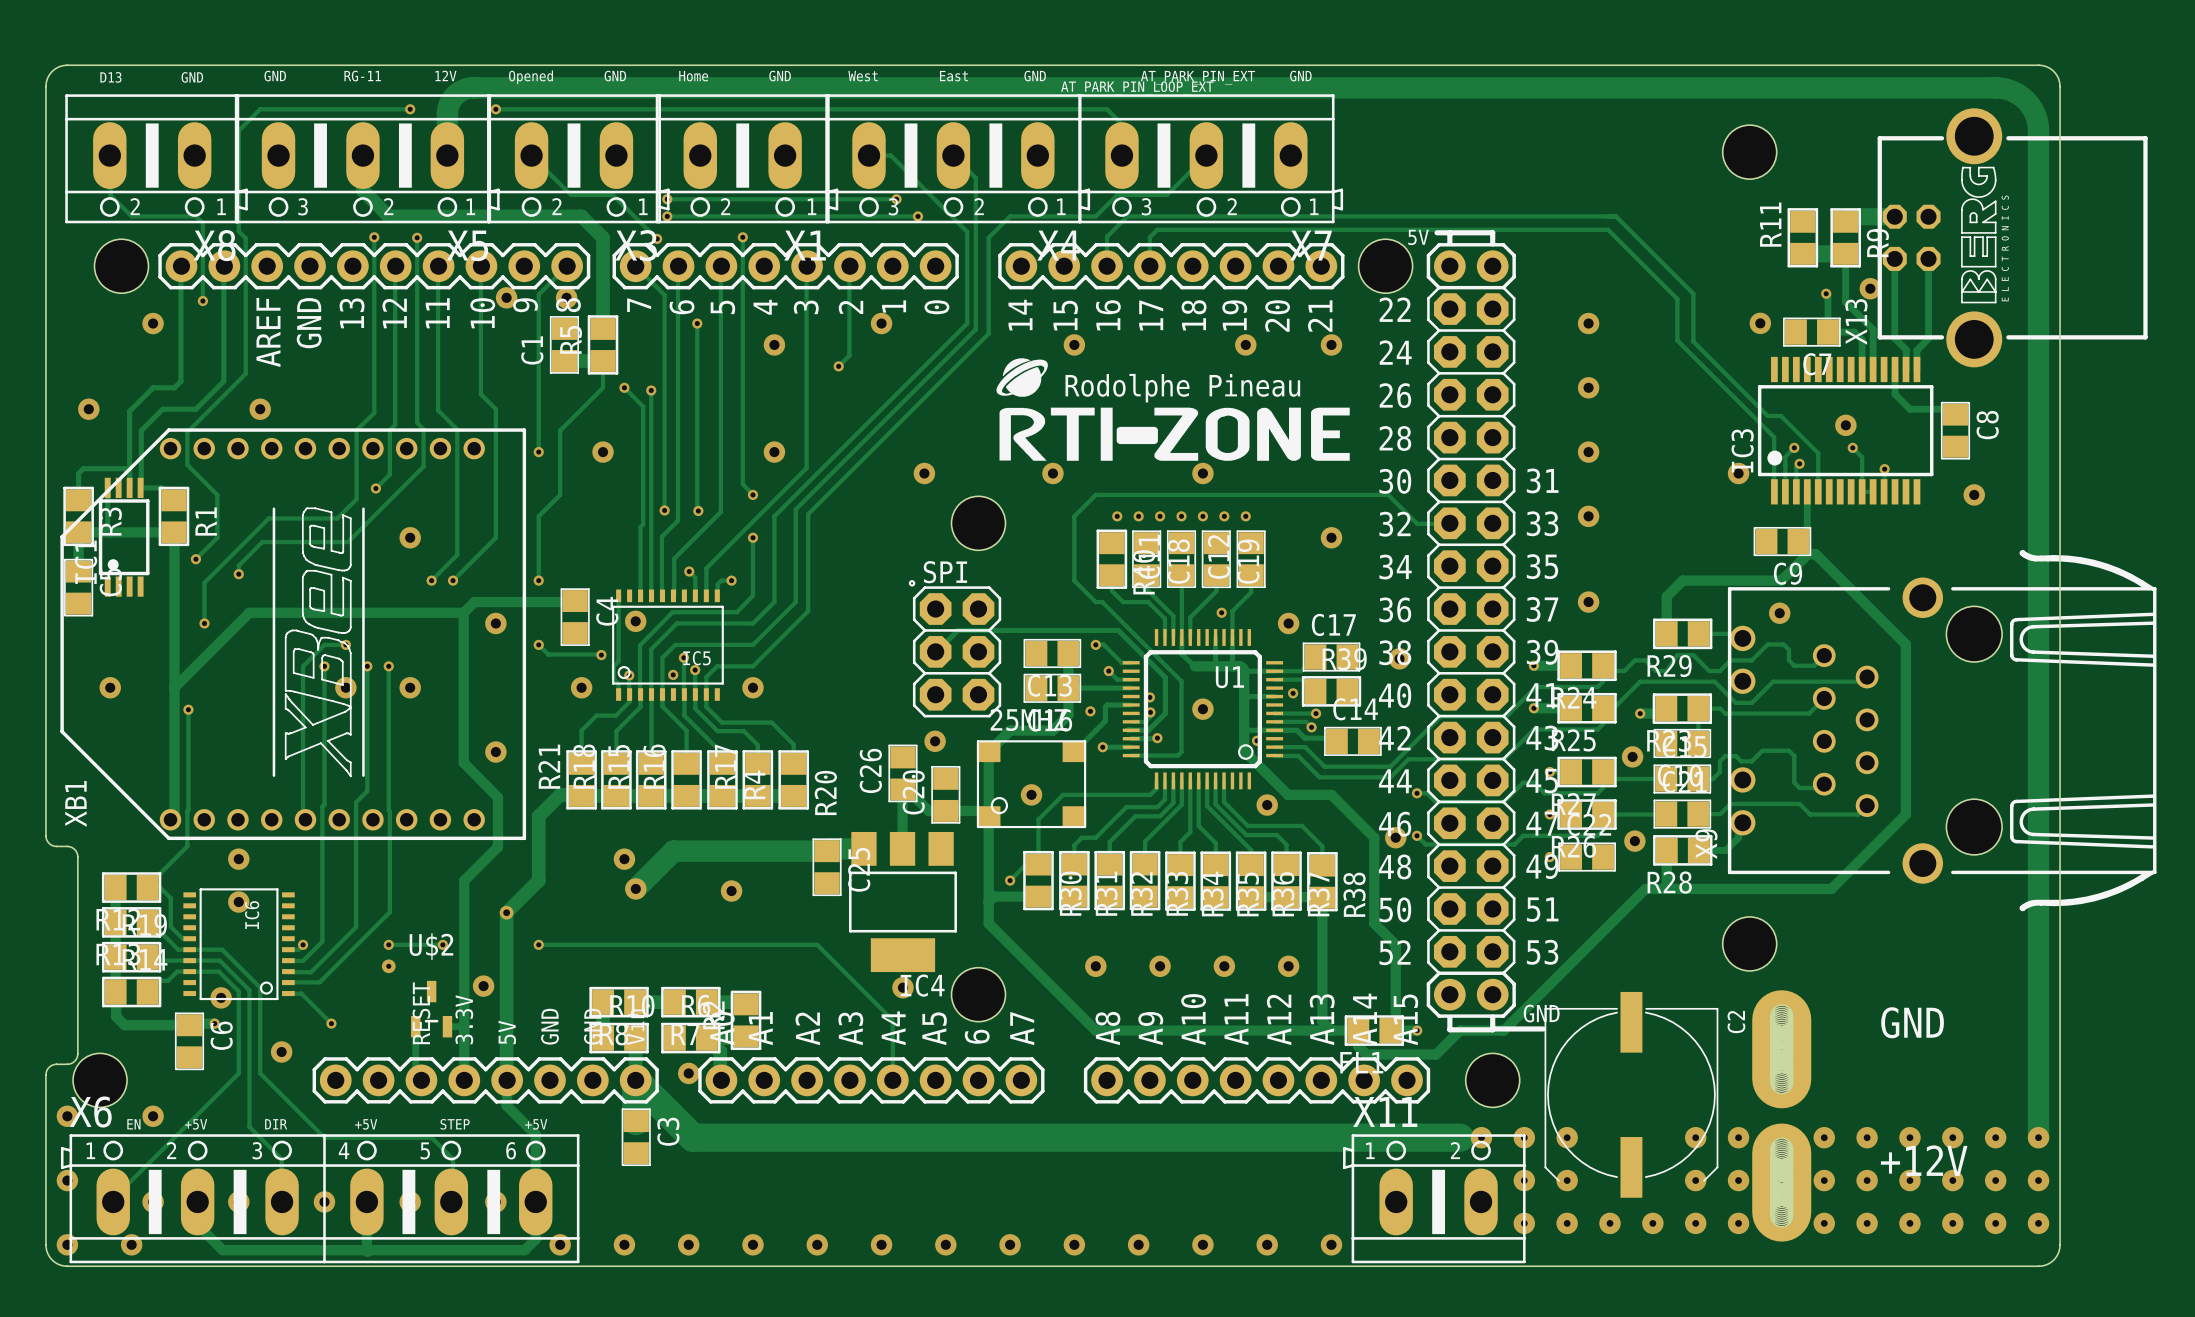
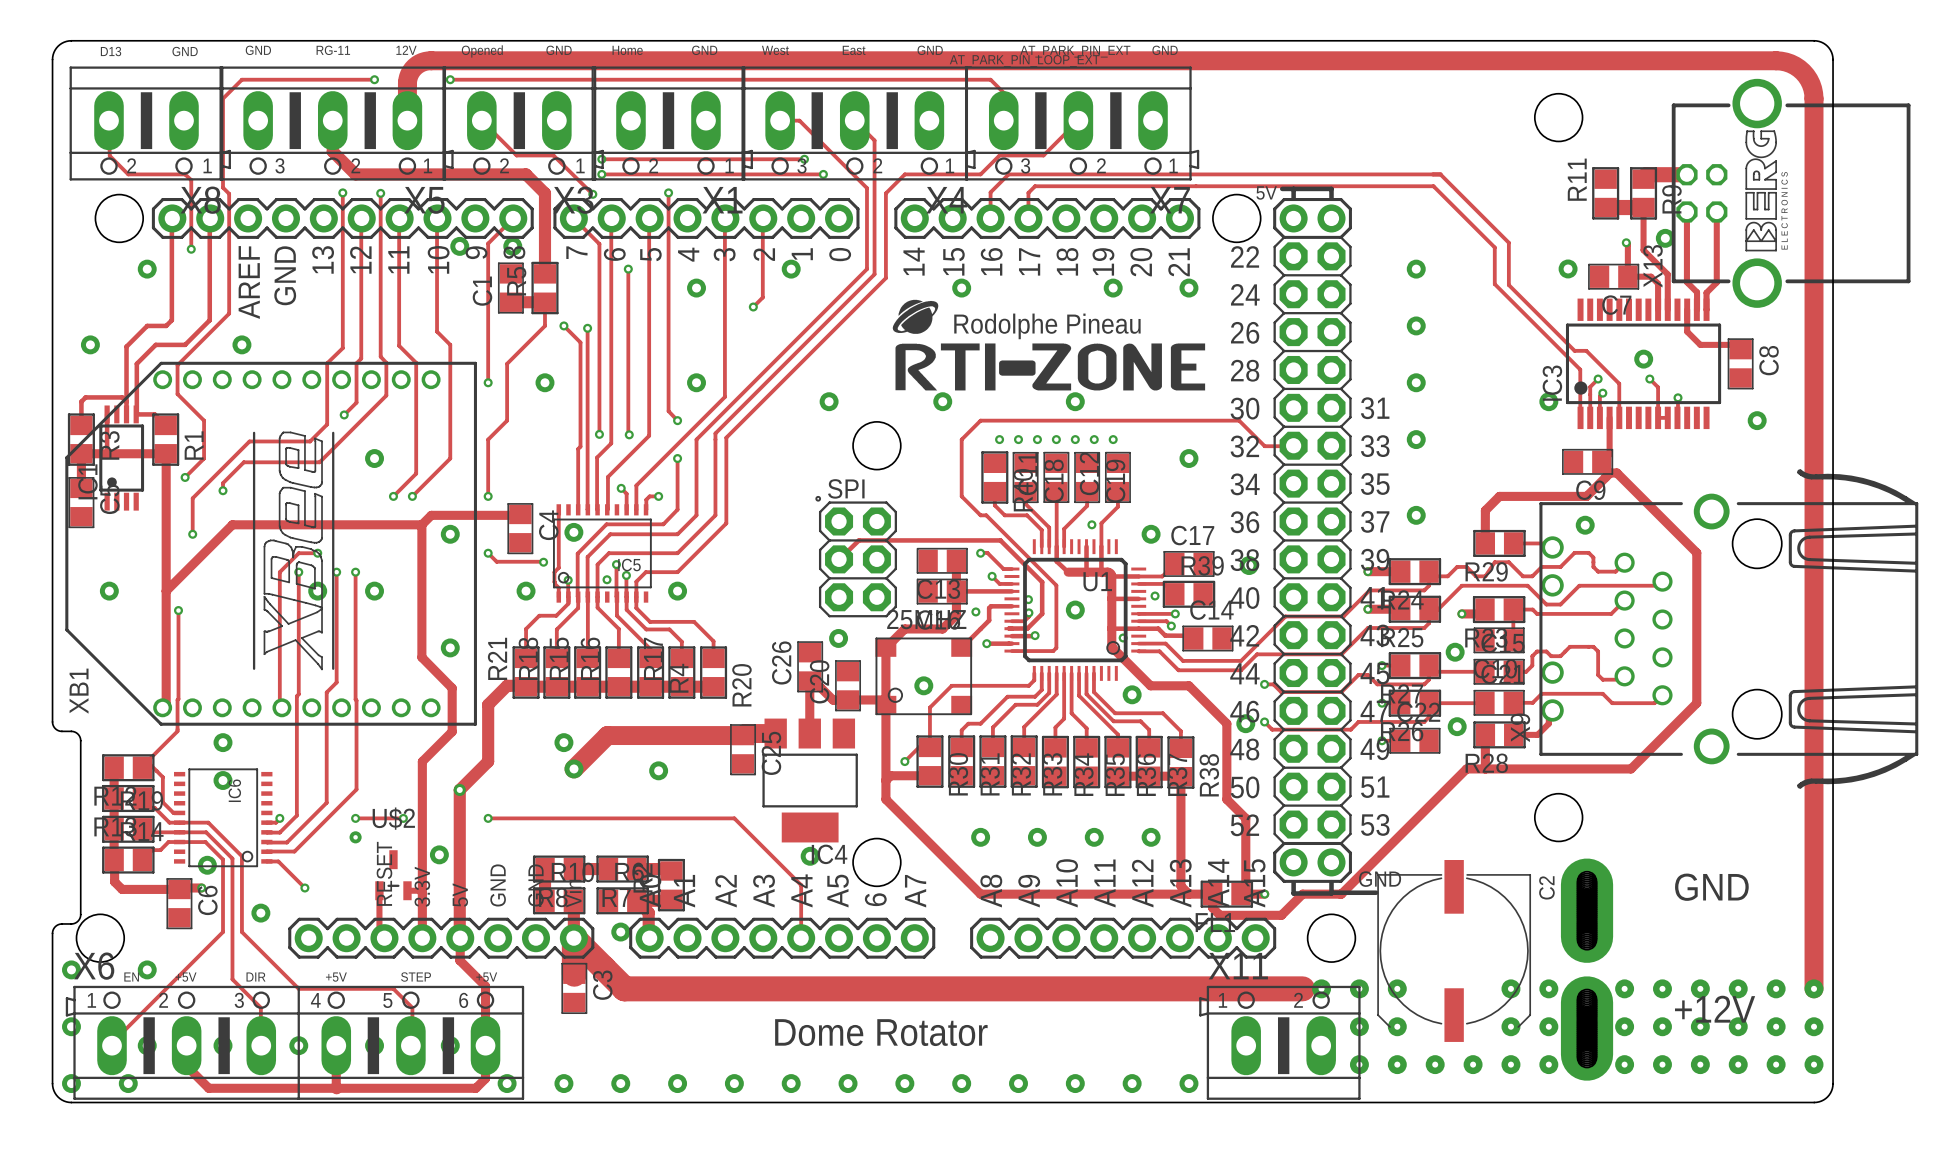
text: none -> Dome Rotator (881, 1032)

